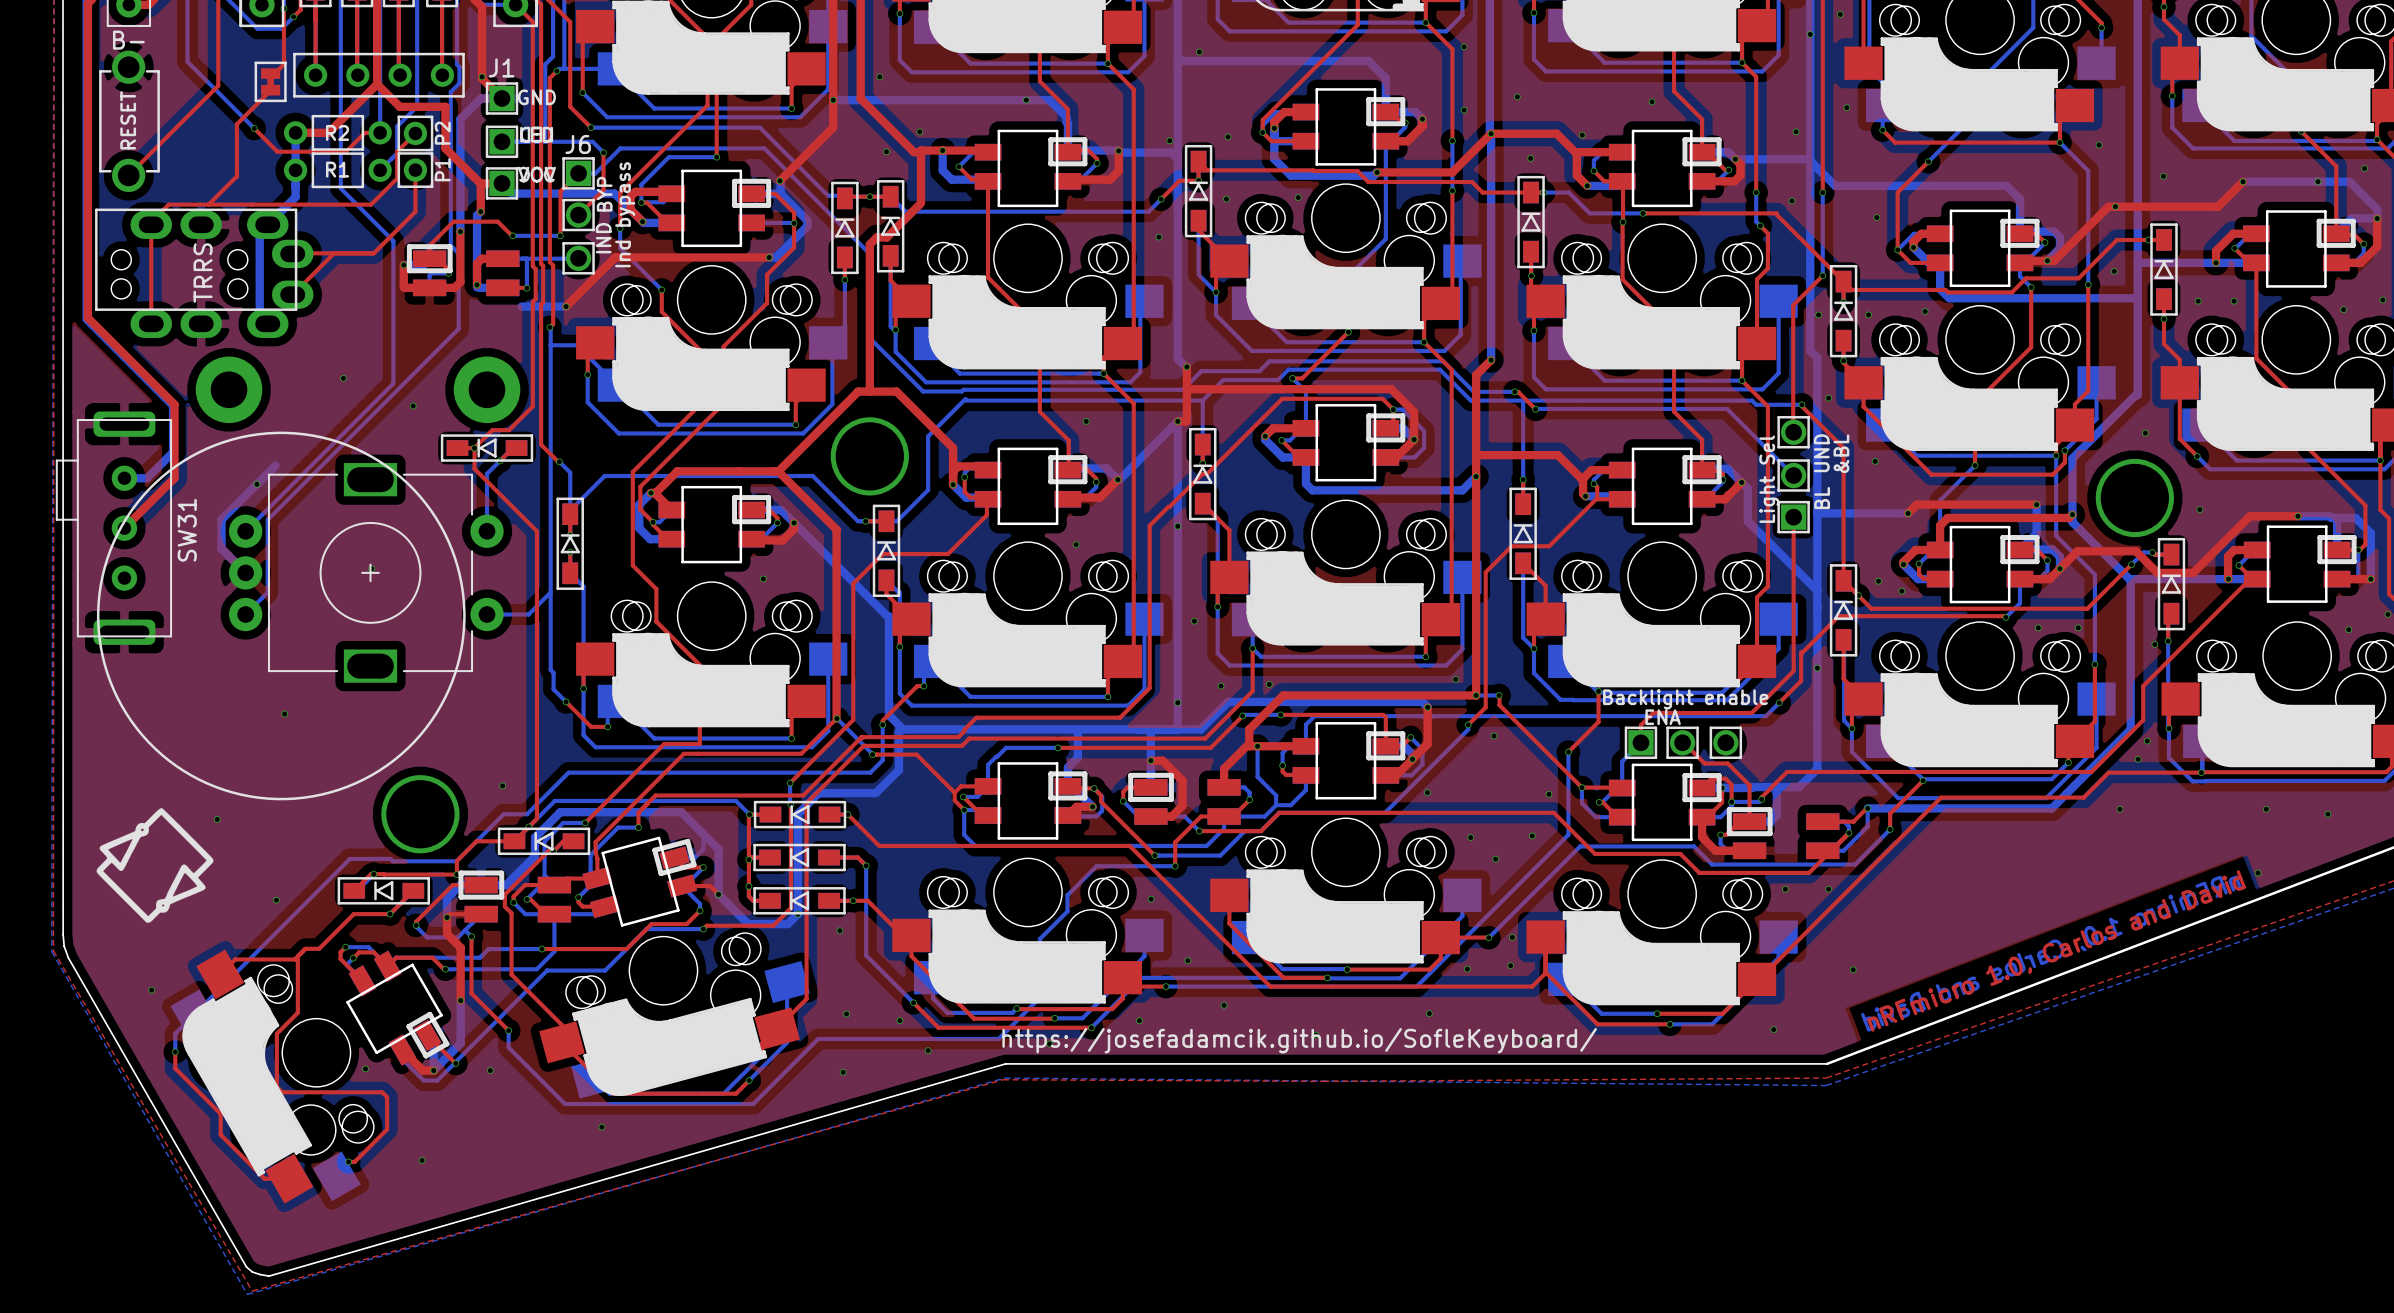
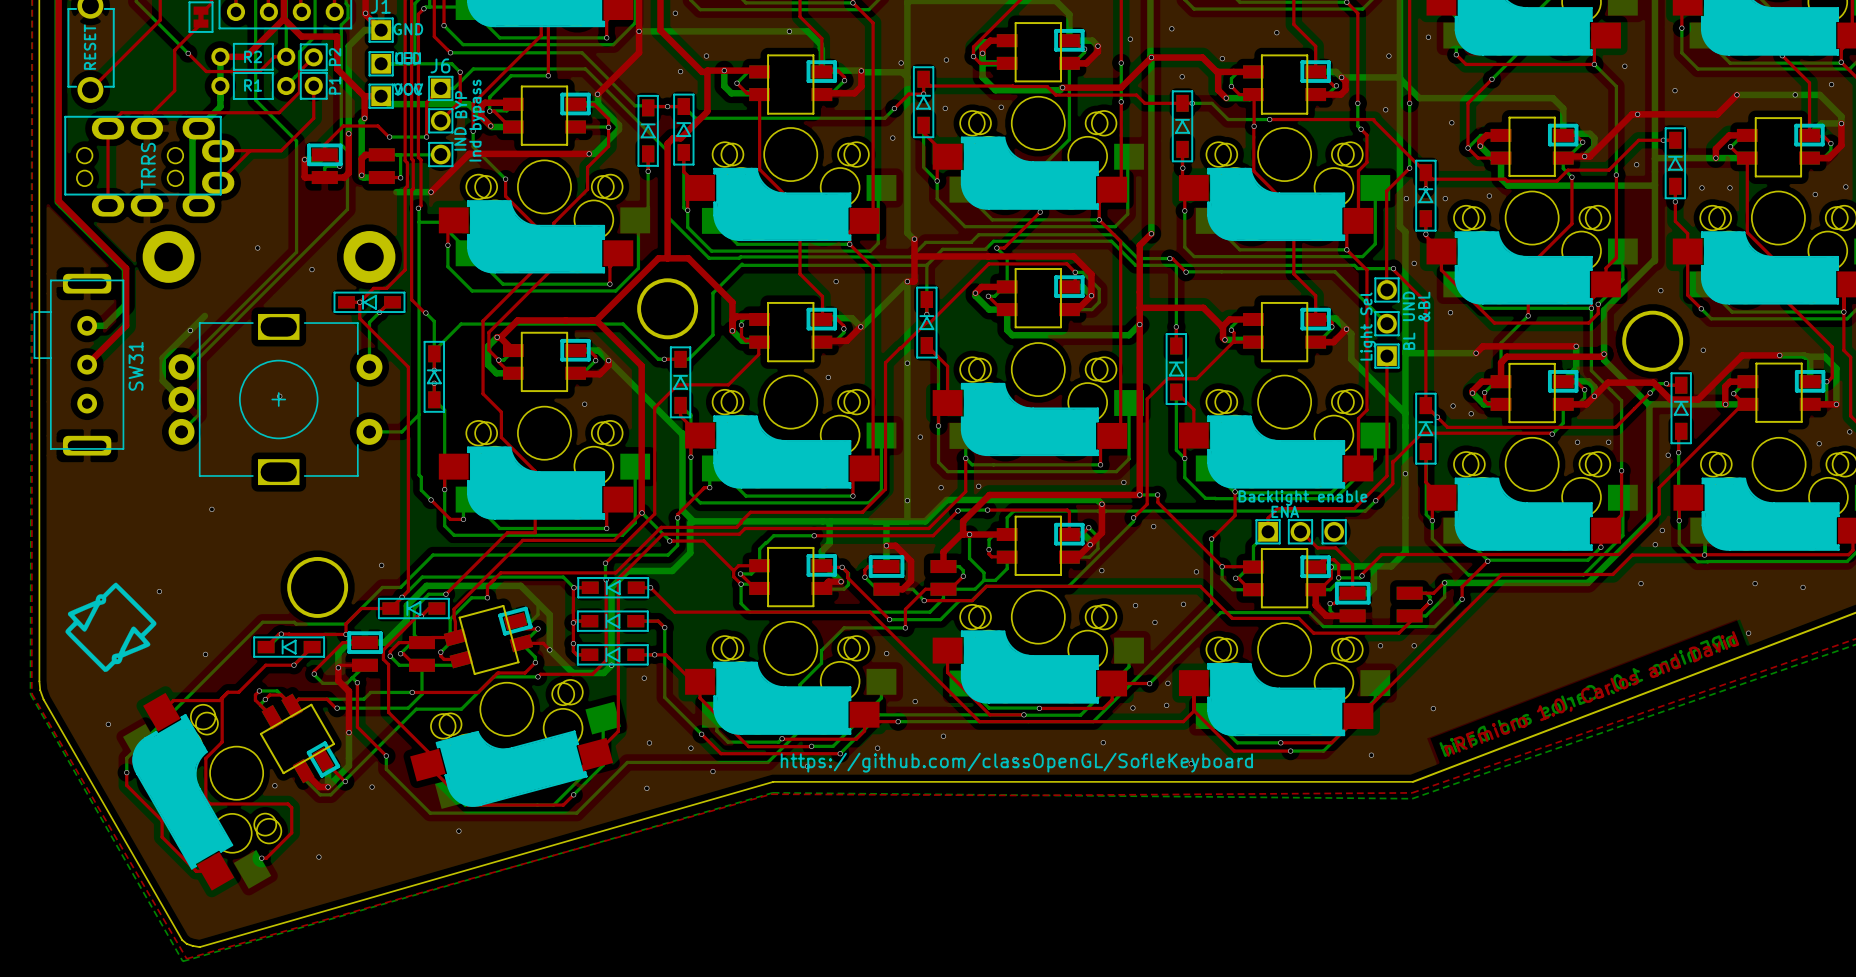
drawing: [96, 431, 466, 801] -> none
text: https://josefadamcik.github.io/SofleKeyboard/ (1299, 1040) -> https://github.com/classOpenGL/SofleKeyboard (1016, 762)

